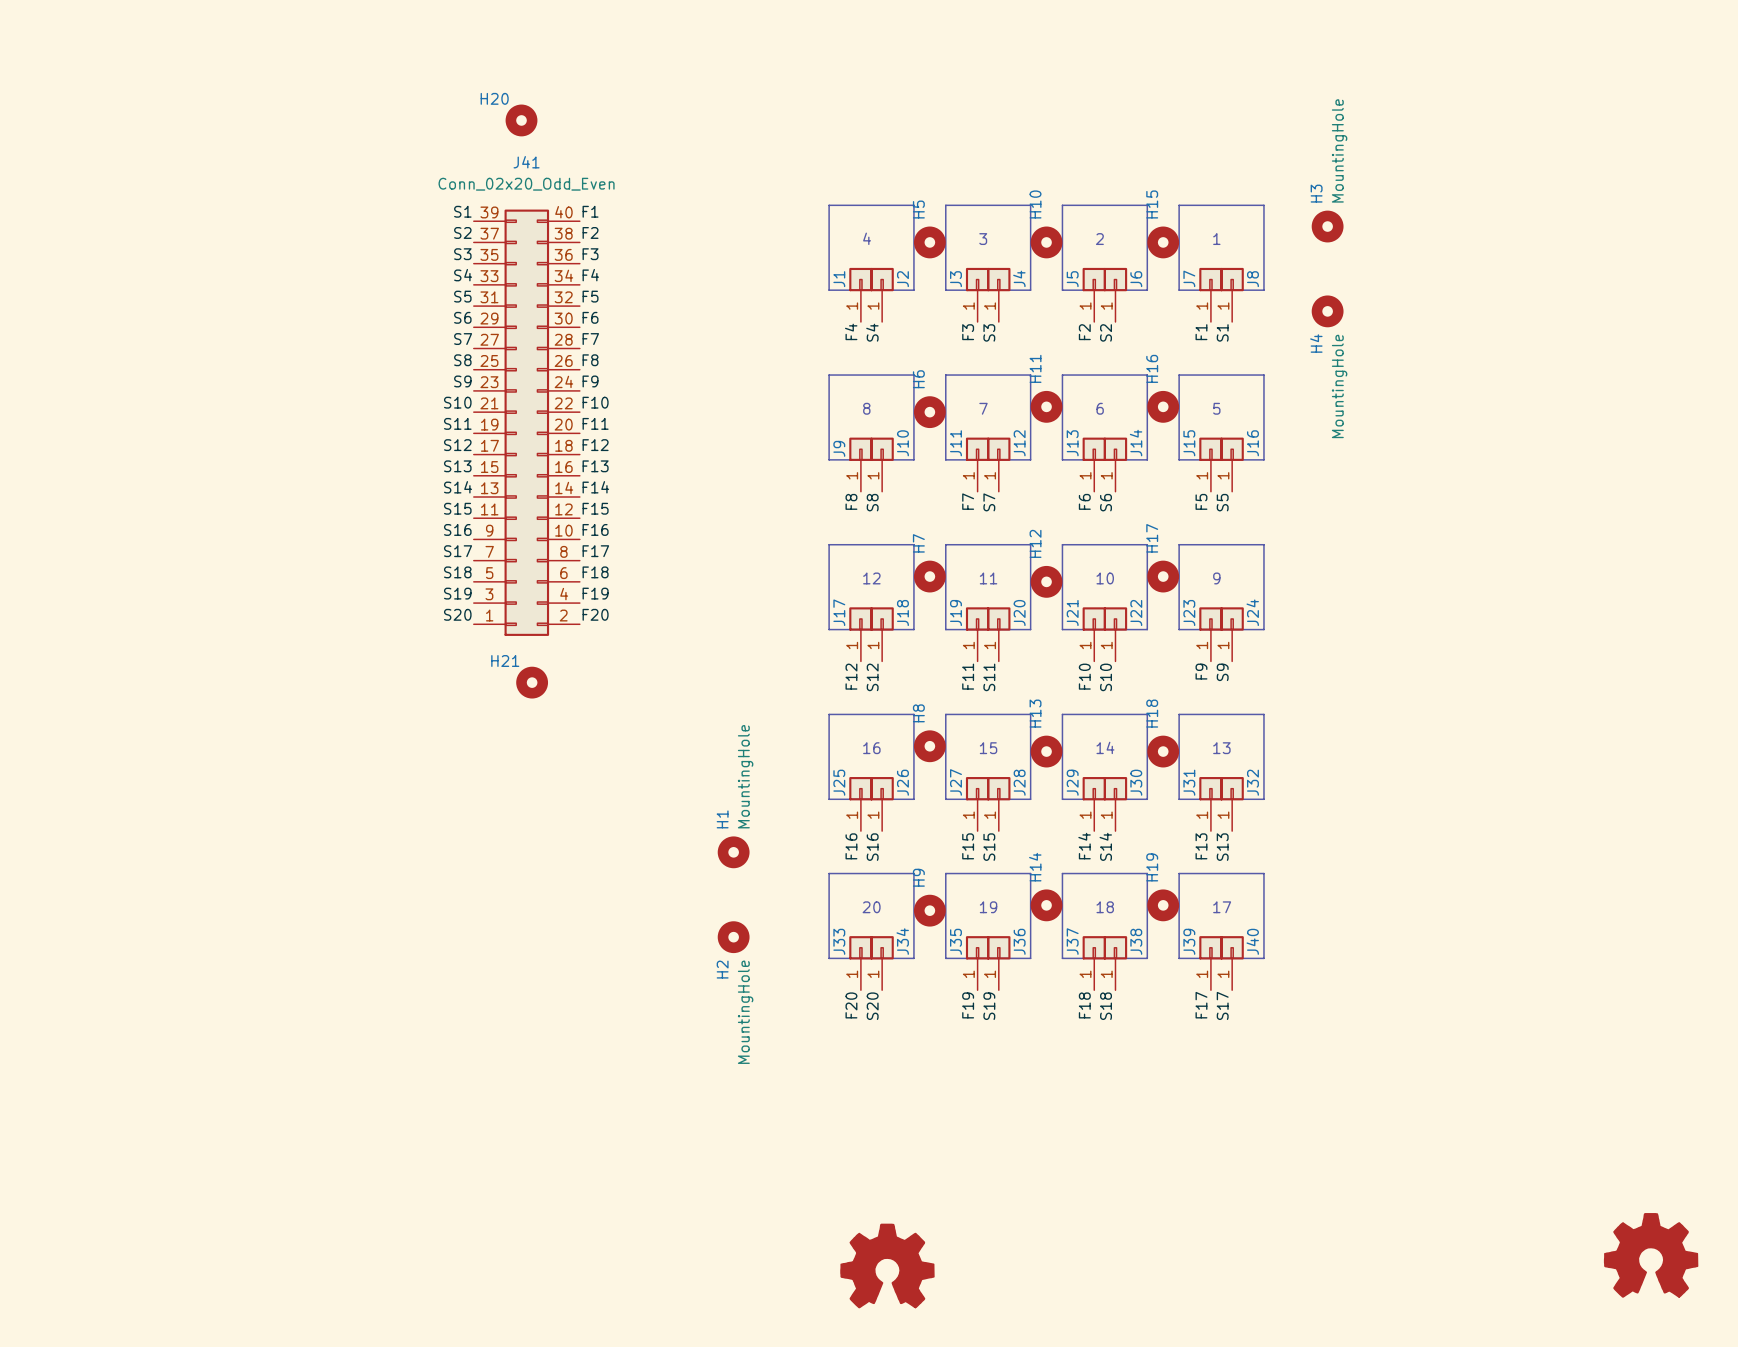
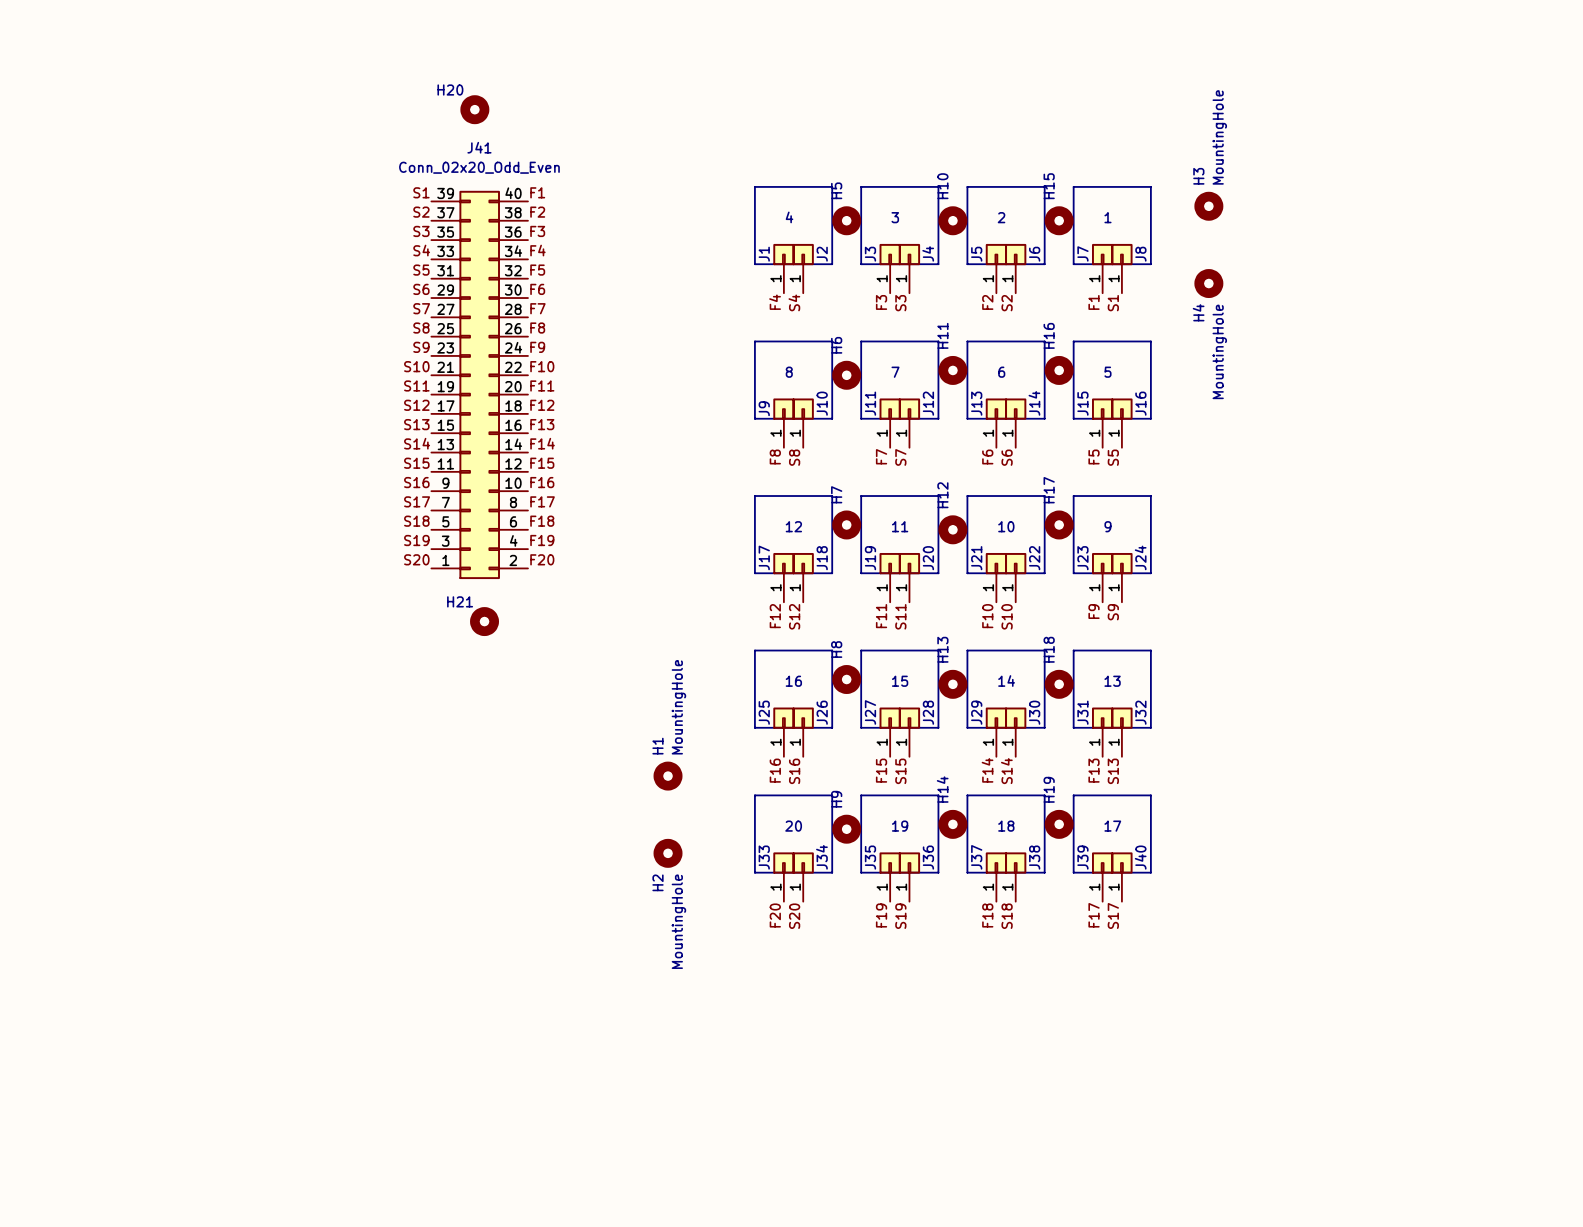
part: (1651, 1255) -> none
part: (887, 1265) -> none

